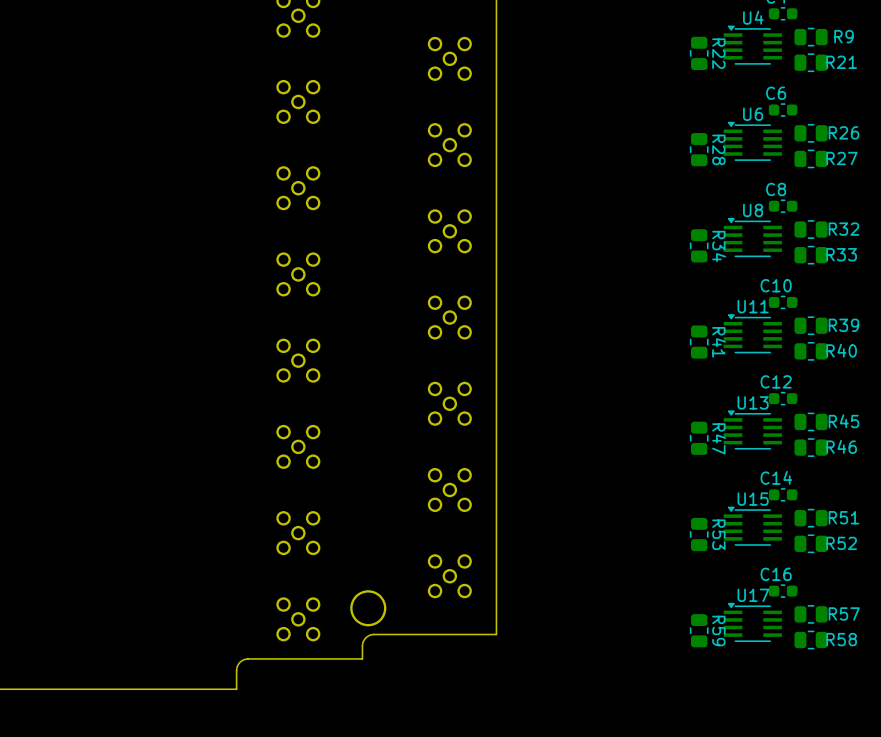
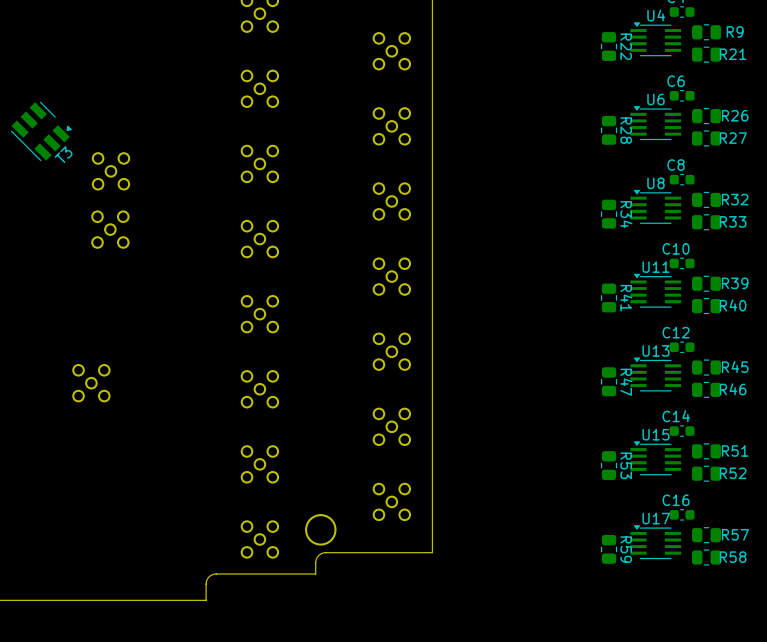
T3: none -> (41, 131)
part: none -> (110, 171)
part: none -> (110, 229)
part: none -> (91, 383)

